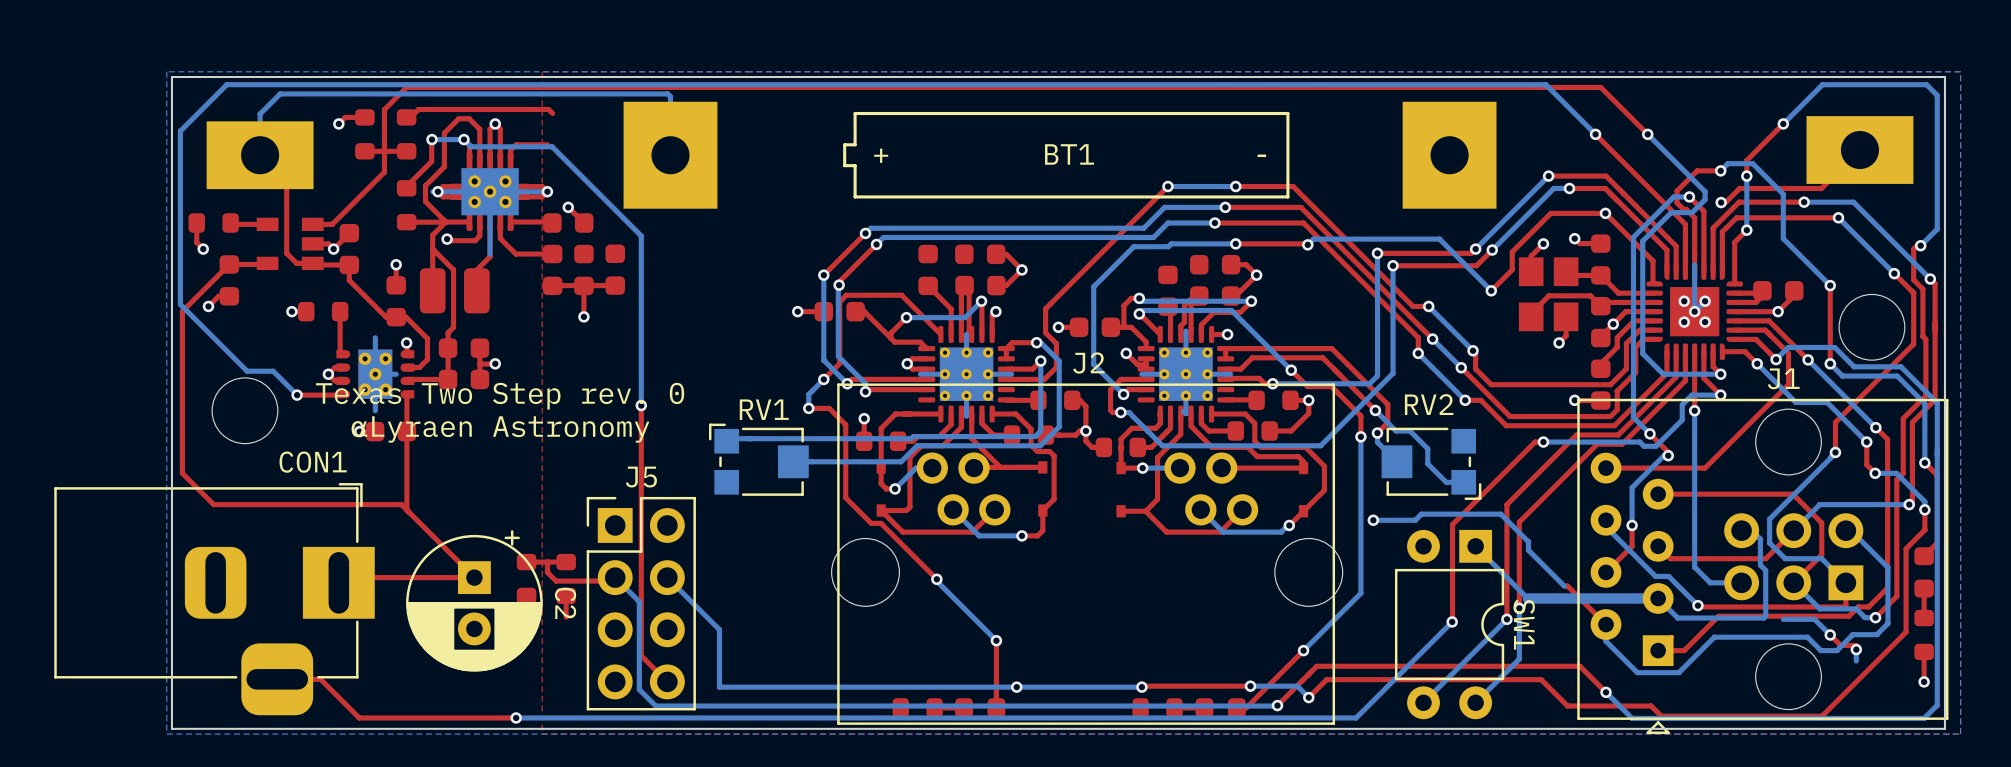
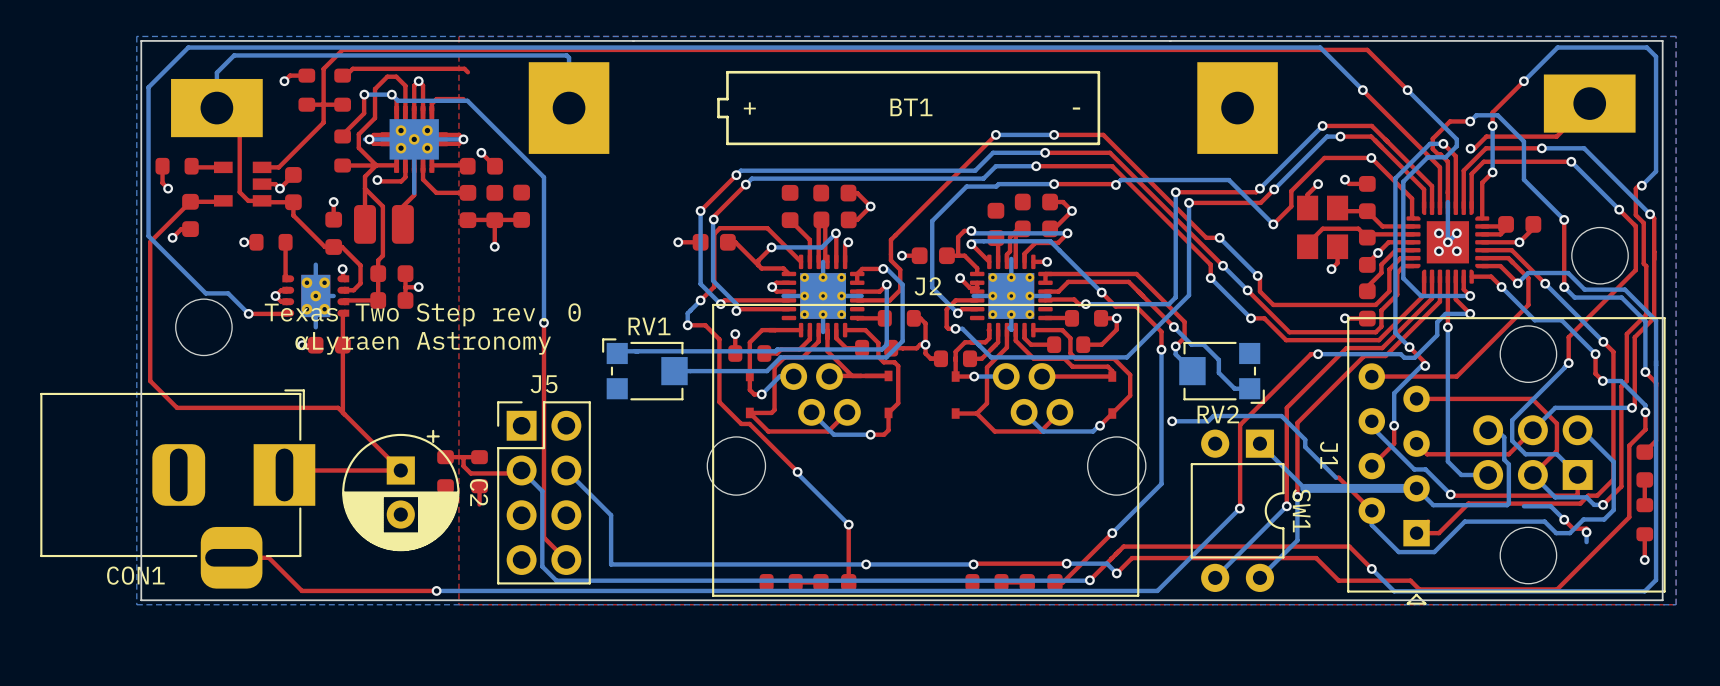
J1 name rotation: 0° (1783, 378) -> 90° clockwise (1328, 455)
J1 name position: J1 (1783, 378) -> J1 (1328, 455)
RV2 name position: RV2 (1429, 404) -> RV2 (1218, 414)
CON1 name position: CON1 (313, 462) -> CON1 (135, 575)

